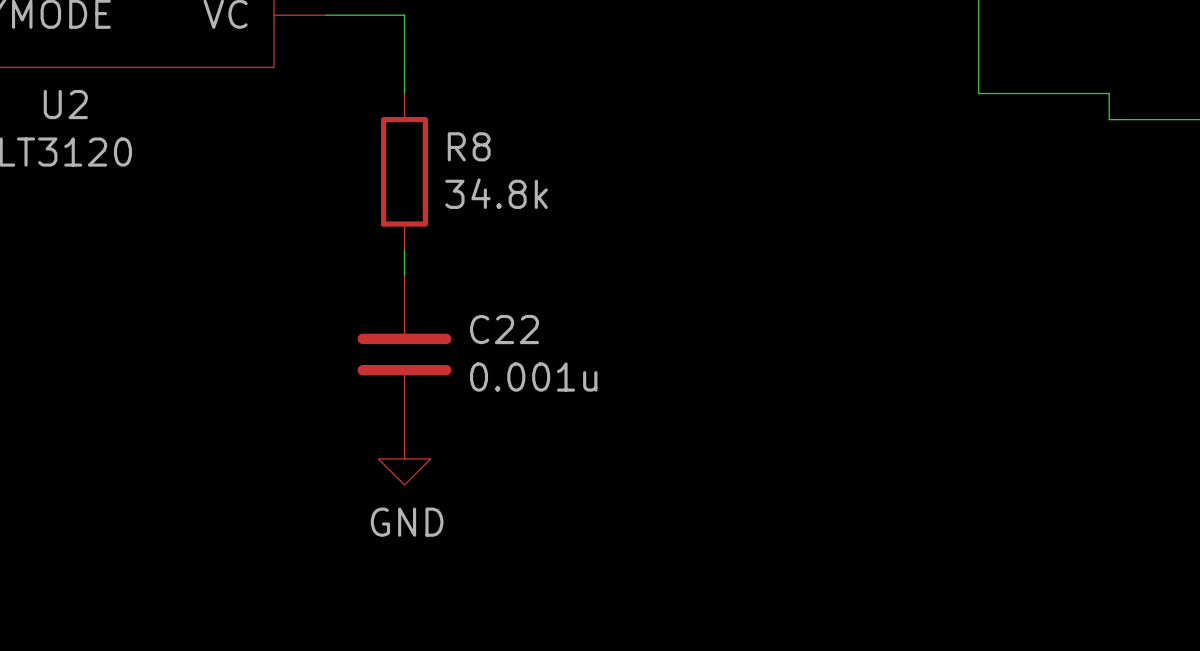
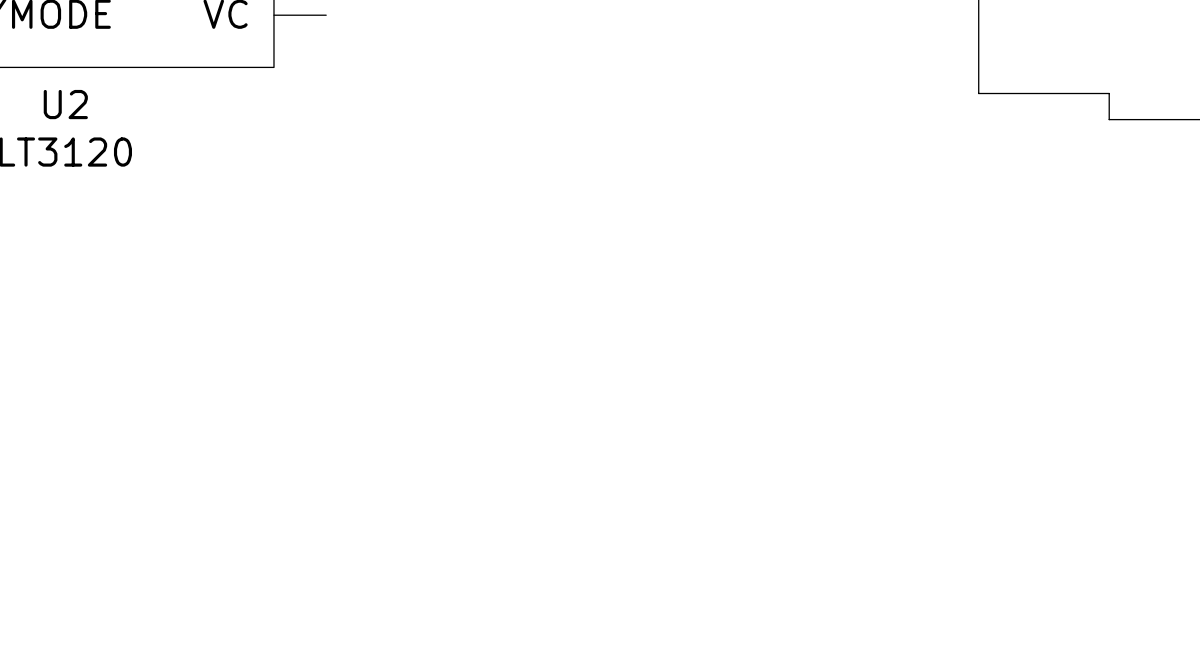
wire: (326, 15) (404, 15) (404, 93) -> none
R8: 34.8k (404, 171) -> none
wire: (404, 250) (404, 276) -> none
C22: 0.001u (404, 354) -> none
power symbol: GND (404, 458) -> none

